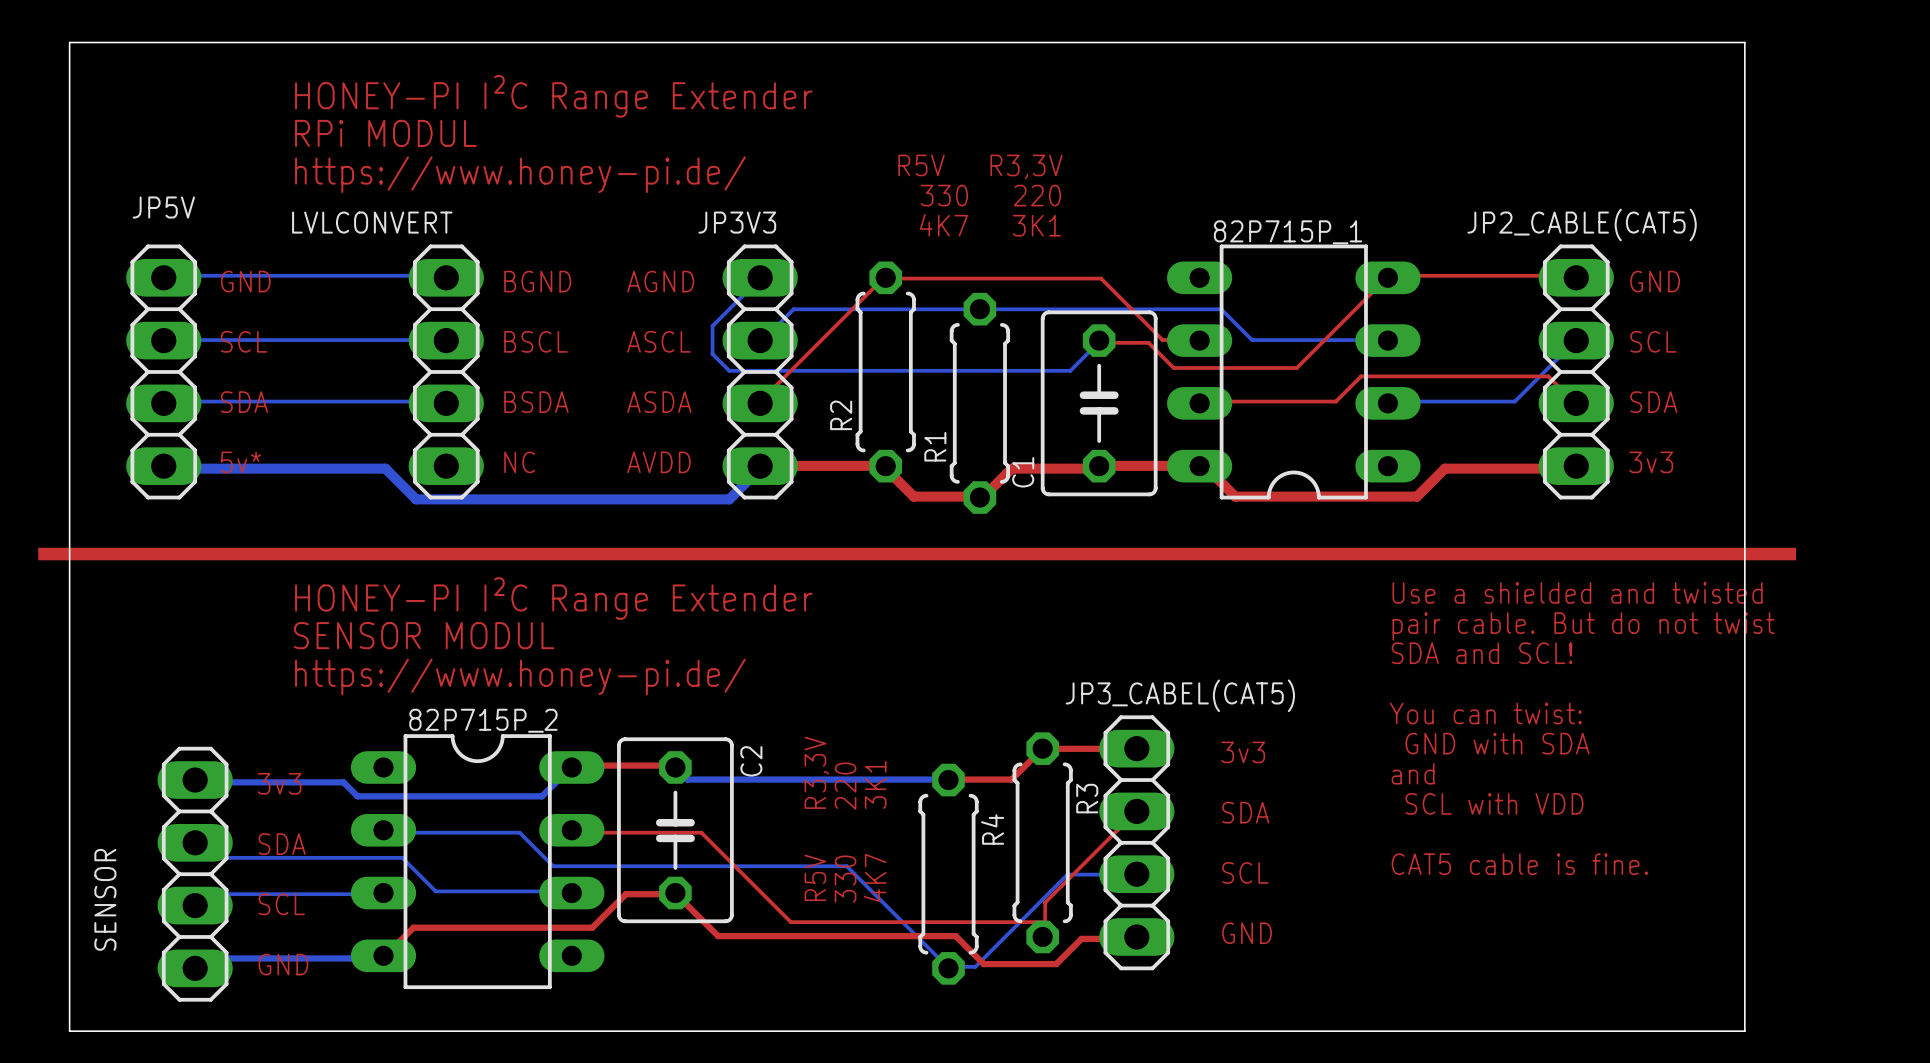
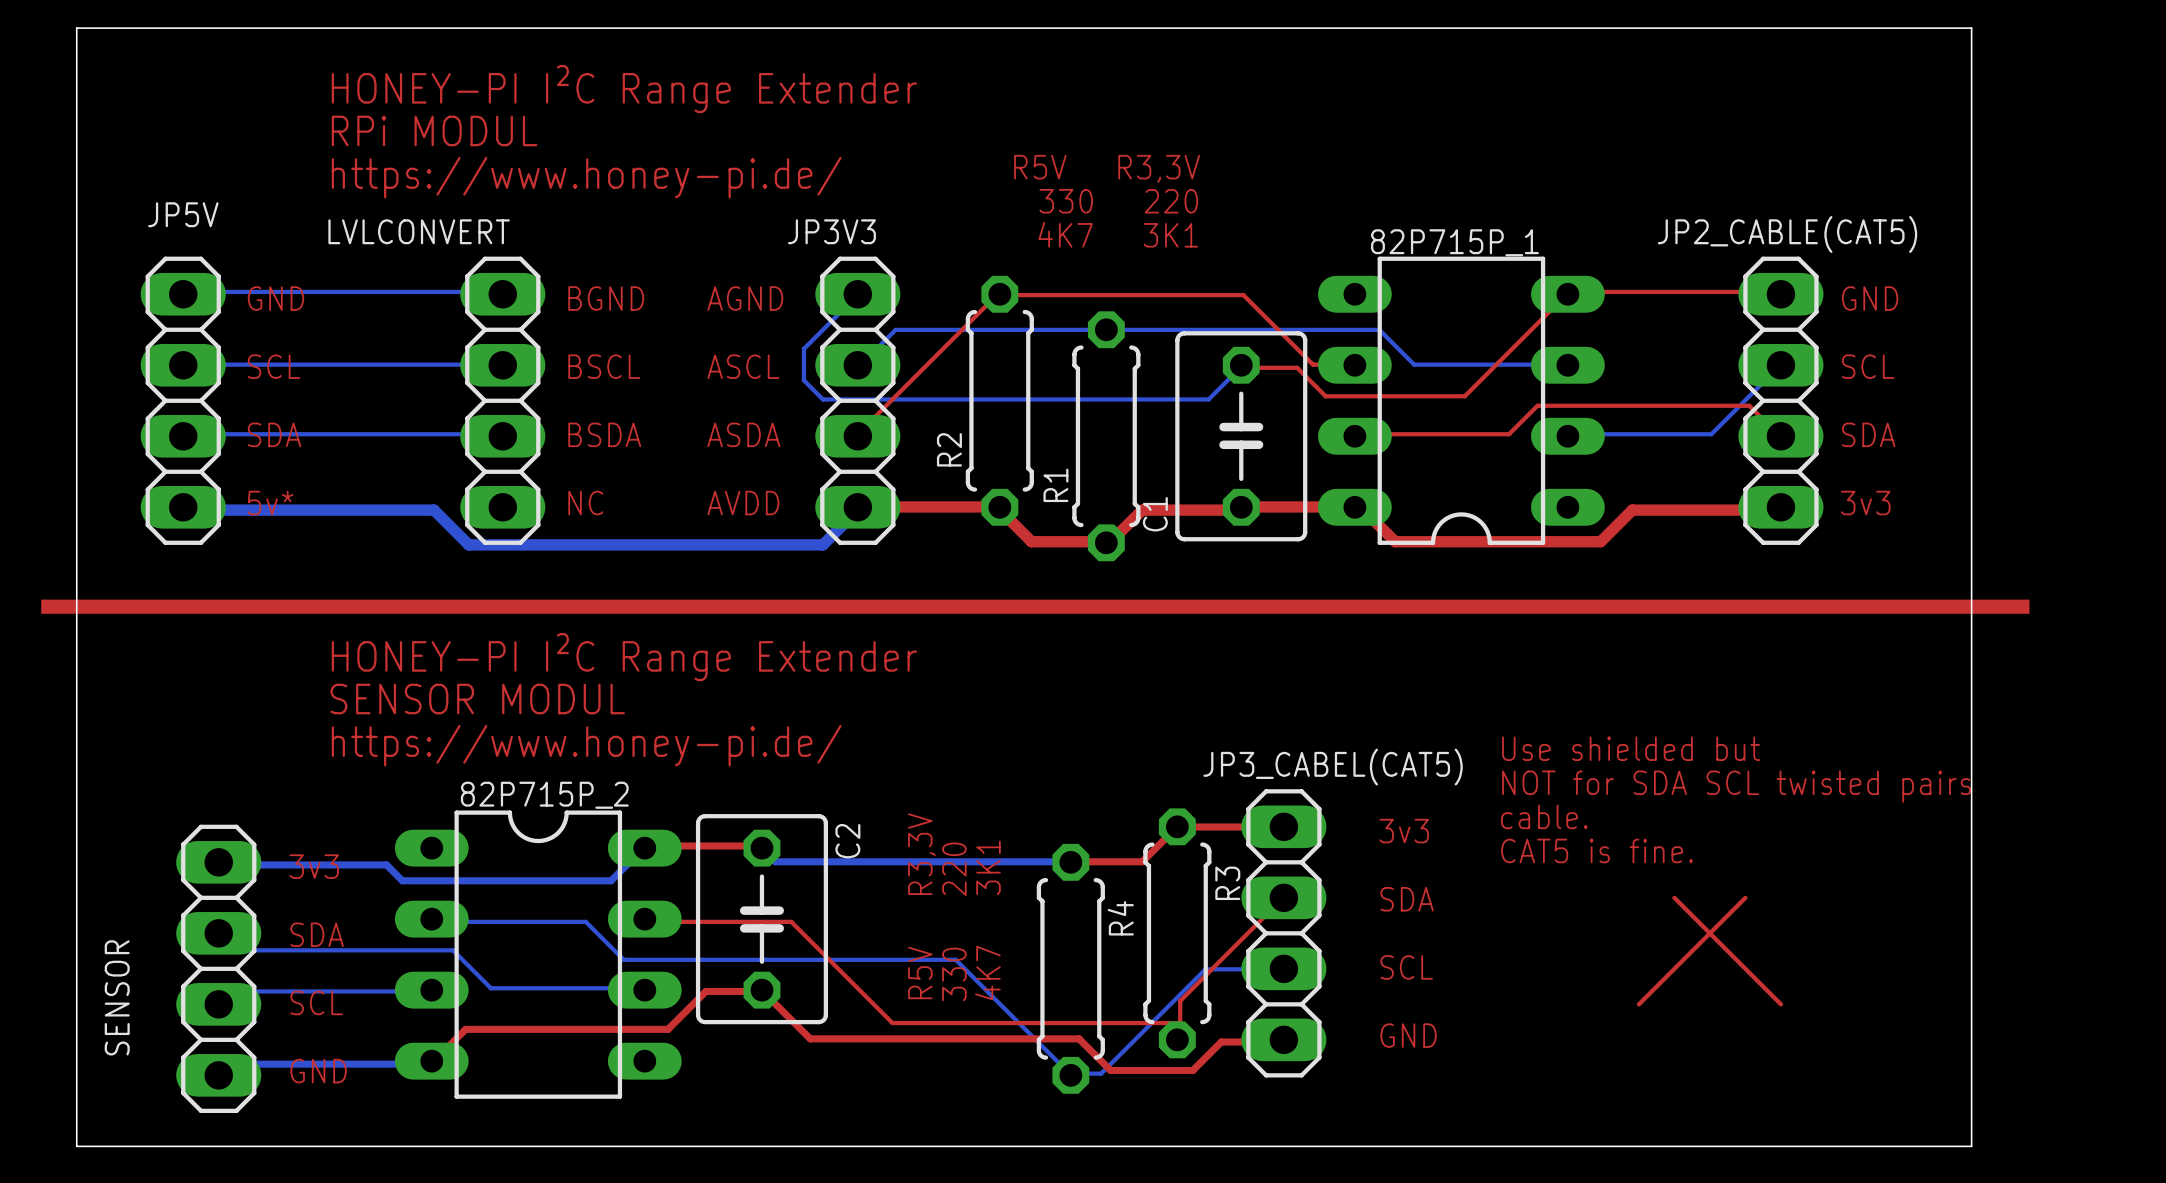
text: Use a shielded and twisted (1577, 592) -> none
text: pair cable. But do not twist (1583, 626) -> none
text: SDA and SCL! (1481, 653) -> none
text: none -> Use shielded but (1631, 748)
text: You can twist: (1485, 713) -> none
text: none -> NOT for SDA SCL twisted pairs (1736, 786)
text: none -> cable. (1544, 816)
text: GND with SDA (1497, 743) -> none
text: none -> CAT5 is fine. (1596, 850)
text: and (1413, 773) -> none
text: SCL with VDD (1494, 803) -> none
top track: none -> (1674, 897) (1780, 1004)
top track: none -> (1745, 897) (1638, 1004)
text: CAT5 cable is fine. (1519, 864) -> none

